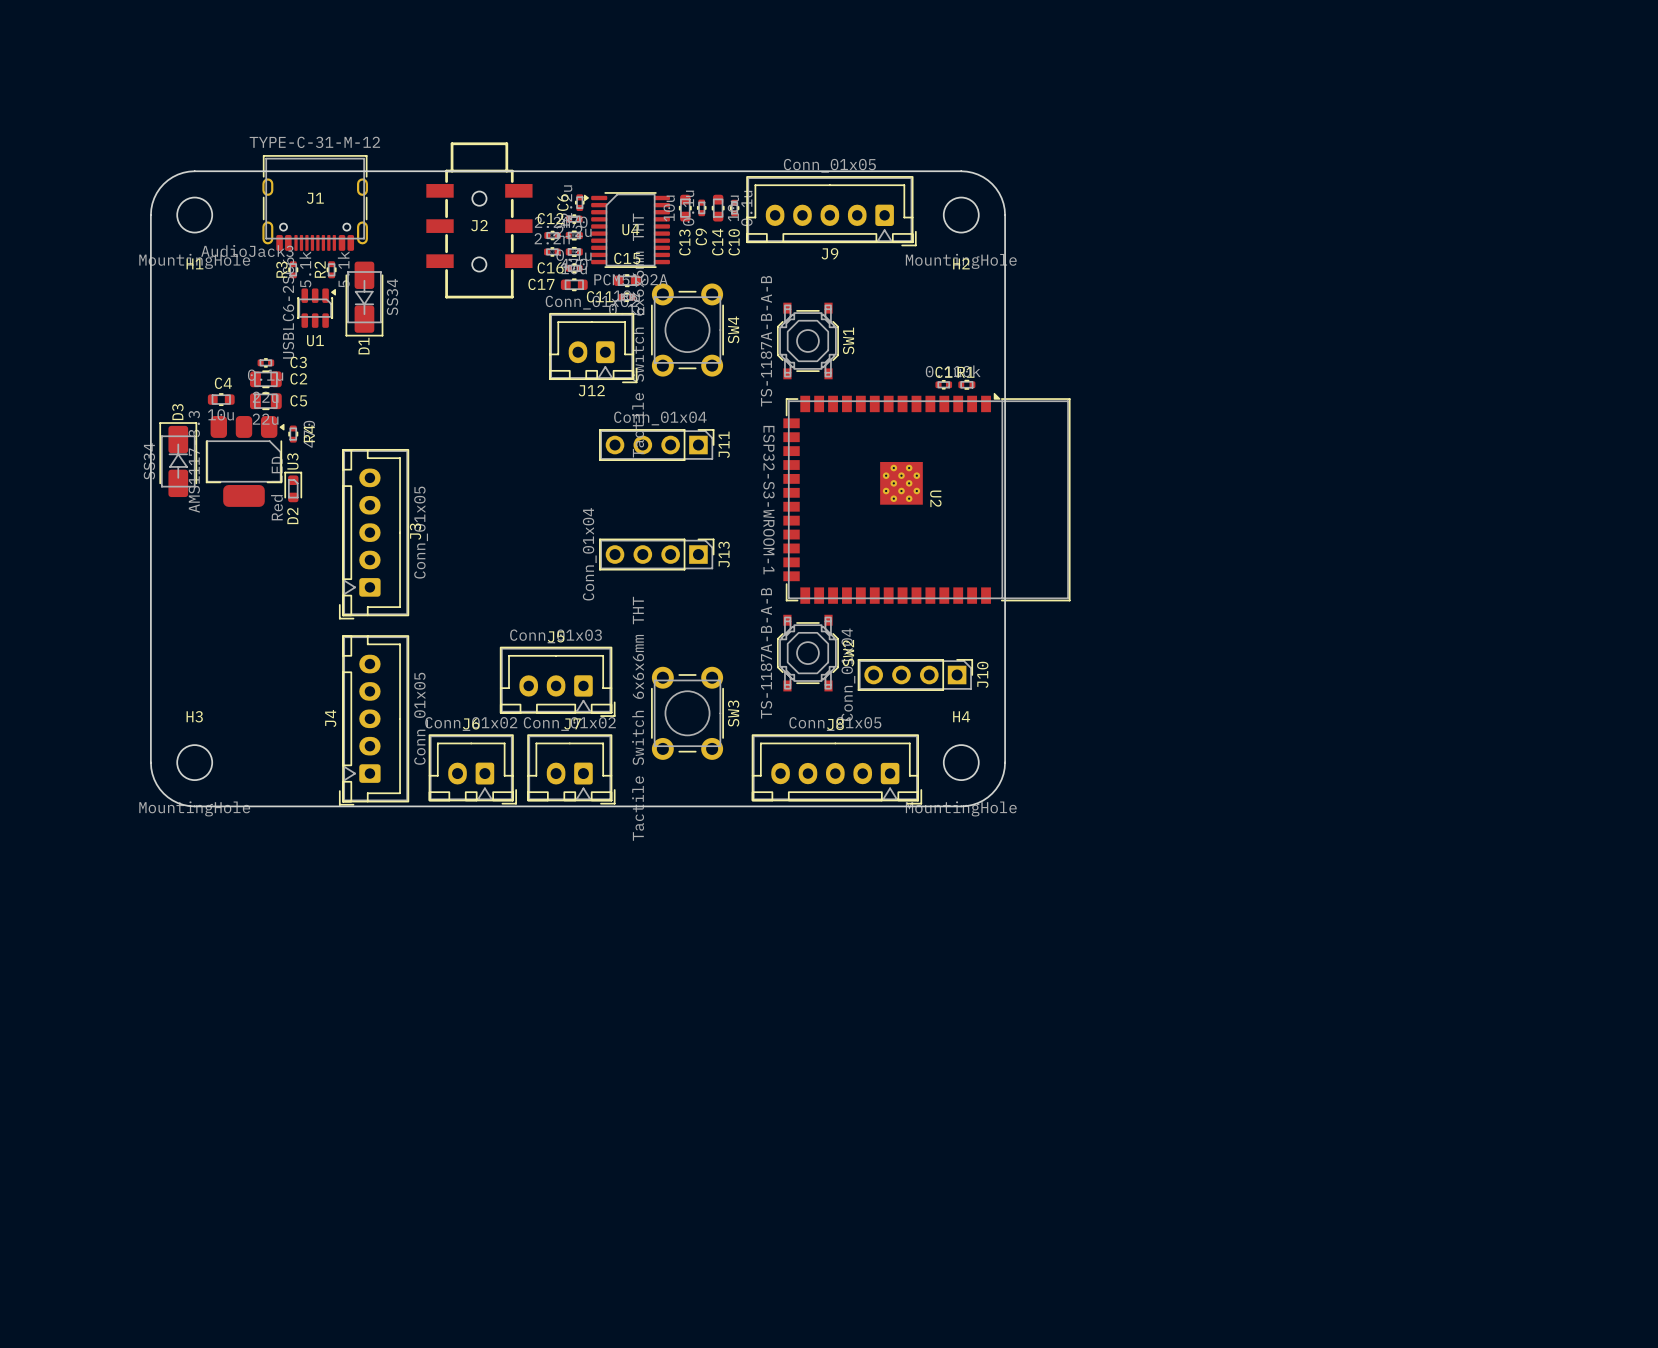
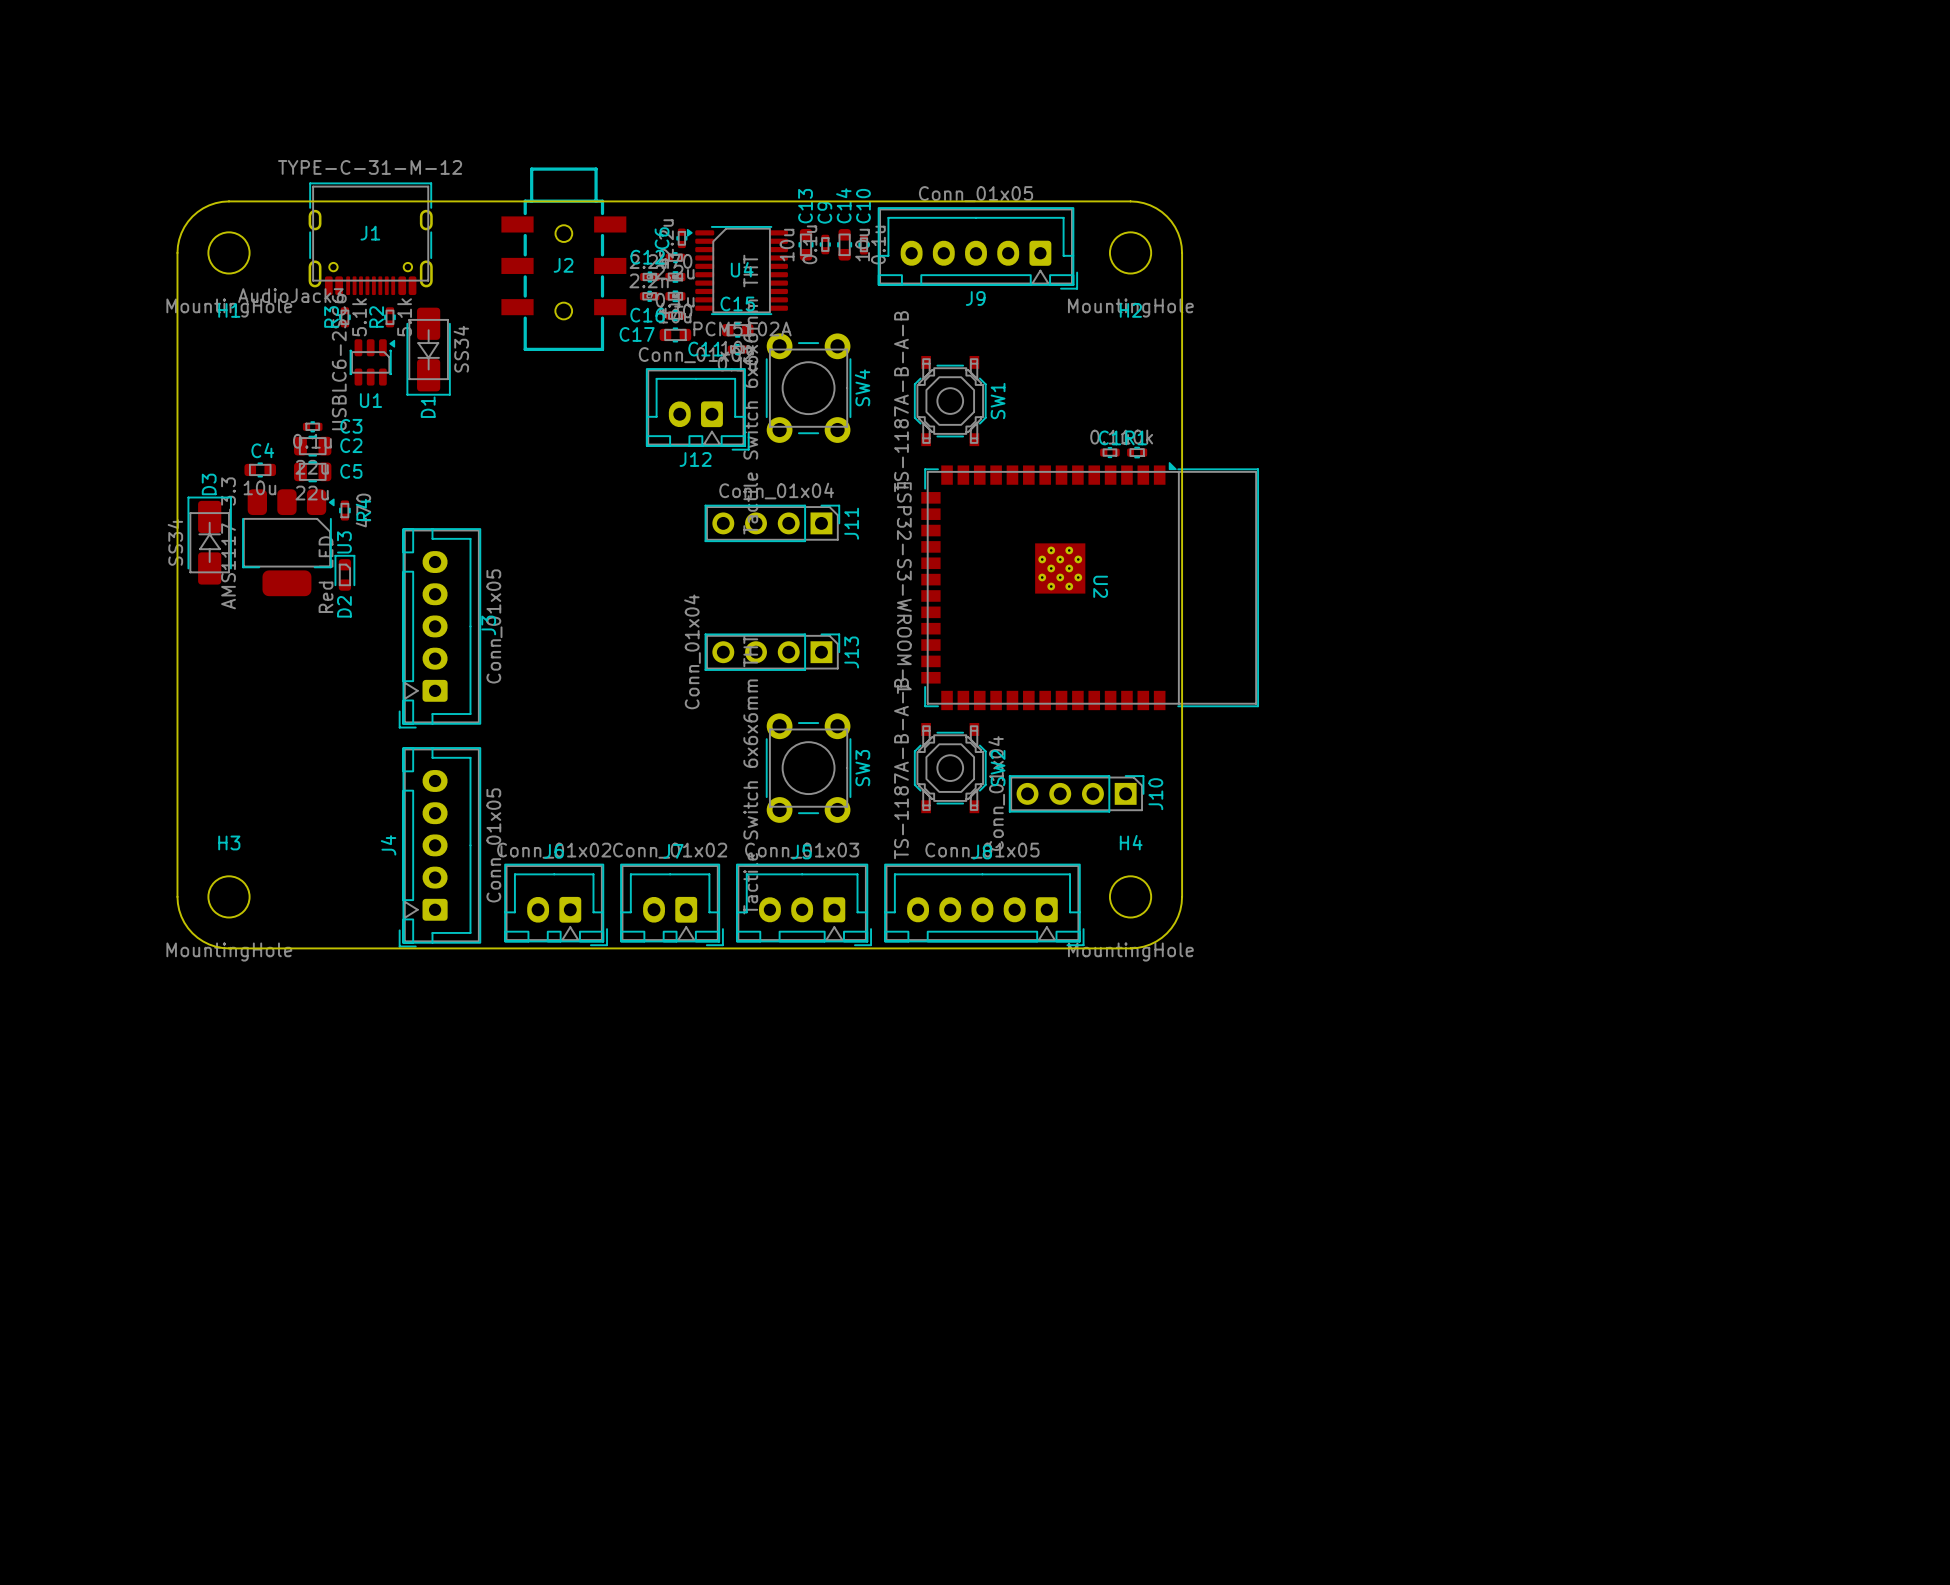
C9 name position: C9 (701, 236) -> C9 (824, 212)
C13 name position: C13 (684, 242) -> C13 (805, 206)
C14 name position: C14 (717, 242) -> C14 (843, 205)
C10 name position: C10 (734, 242) -> C10 (863, 206)
J5 position: (557, 681) -> (804, 904)
SW3 position: (687, 713) -> (808, 768)

